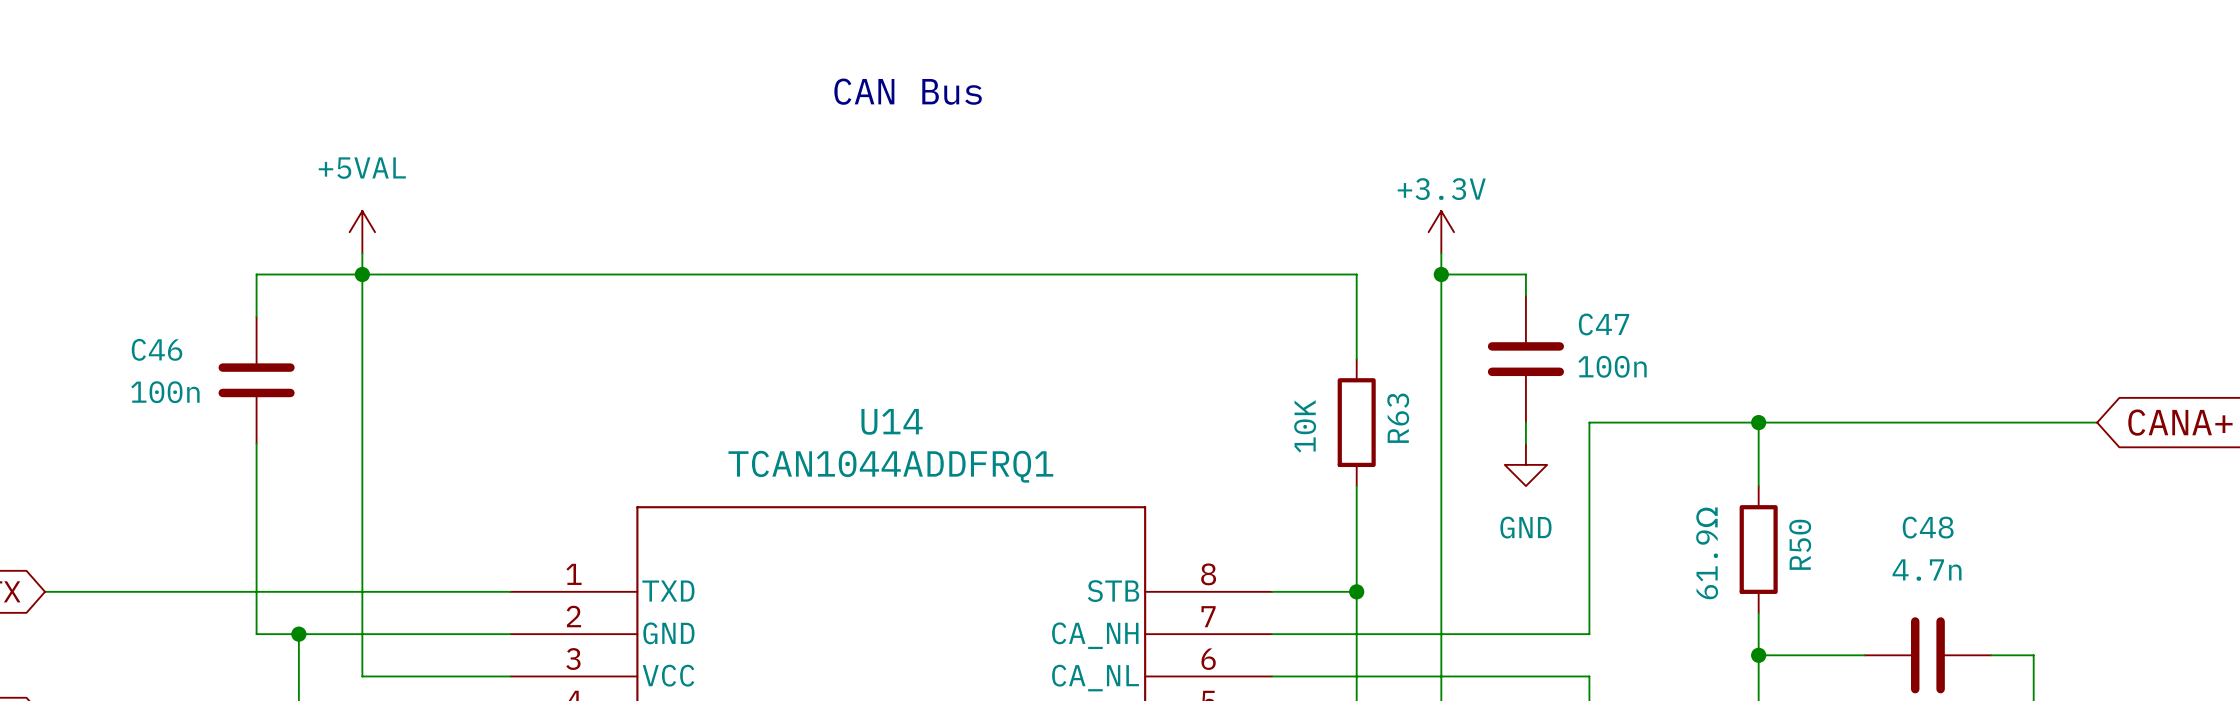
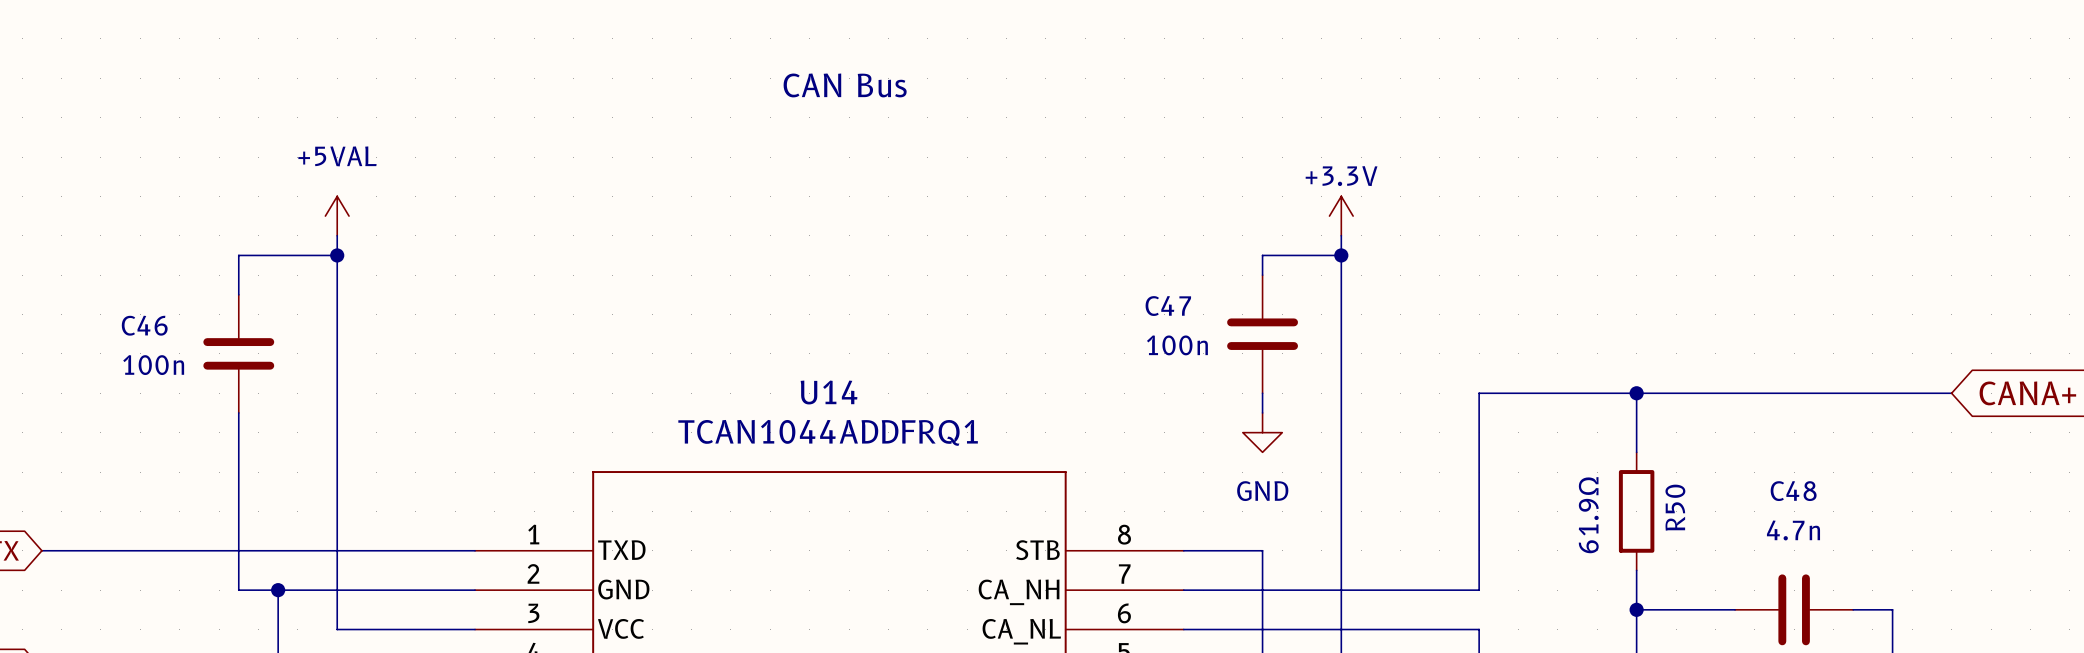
wire: (362, 274) (1356, 274) -> none
wire: (1441, 274) (1525, 274) (1525, 295) -> (1341, 255) (1262, 255)
C47 name position: C47 (1604, 324) -> C47 (1168, 306)
C47 position: (1525, 359) -> (1262, 334)
C47 value position: 100n (1612, 366) -> 100n (1177, 345)
R63: 10K (1356, 422) -> none
wire: (1525, 422) (1525, 443) -> (1262, 393) (1262, 412)
power symbol position: GND (1525, 464) -> GND (1262, 432)
wire: (1356, 486) (1356, 591) -> none
junction: (1356, 591) -> none

